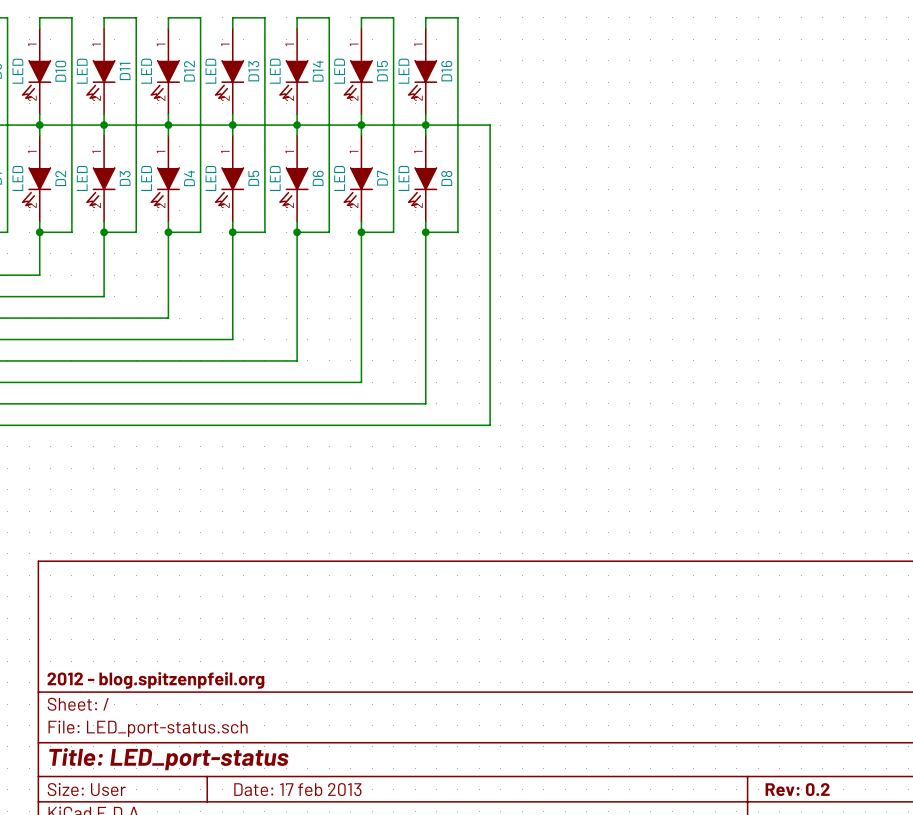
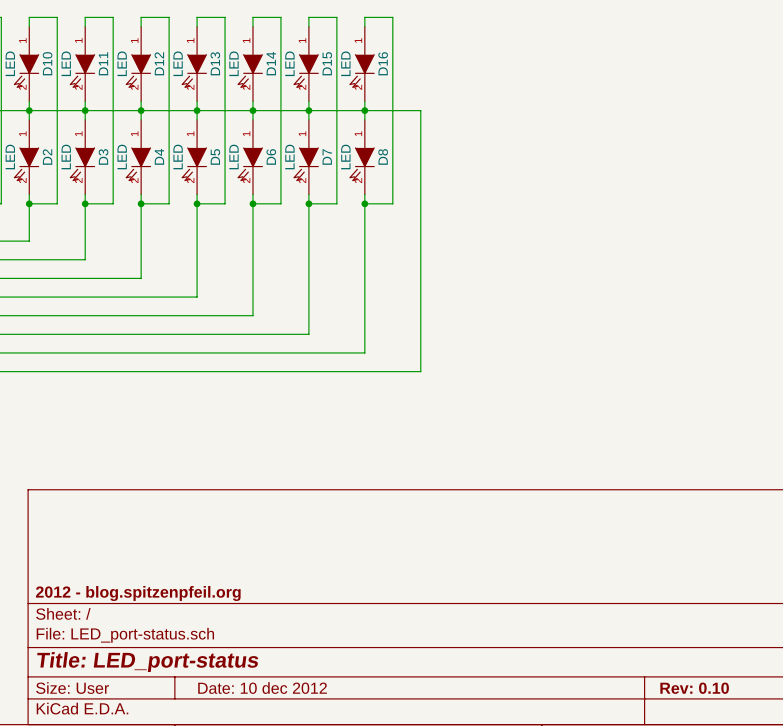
title block: Date: 17 feb 2013 (297, 789) -> Date: 10 dec 2012 (262, 688)
title block: Rev: 0.2 (797, 789) -> Rev: 0.10 (694, 688)

